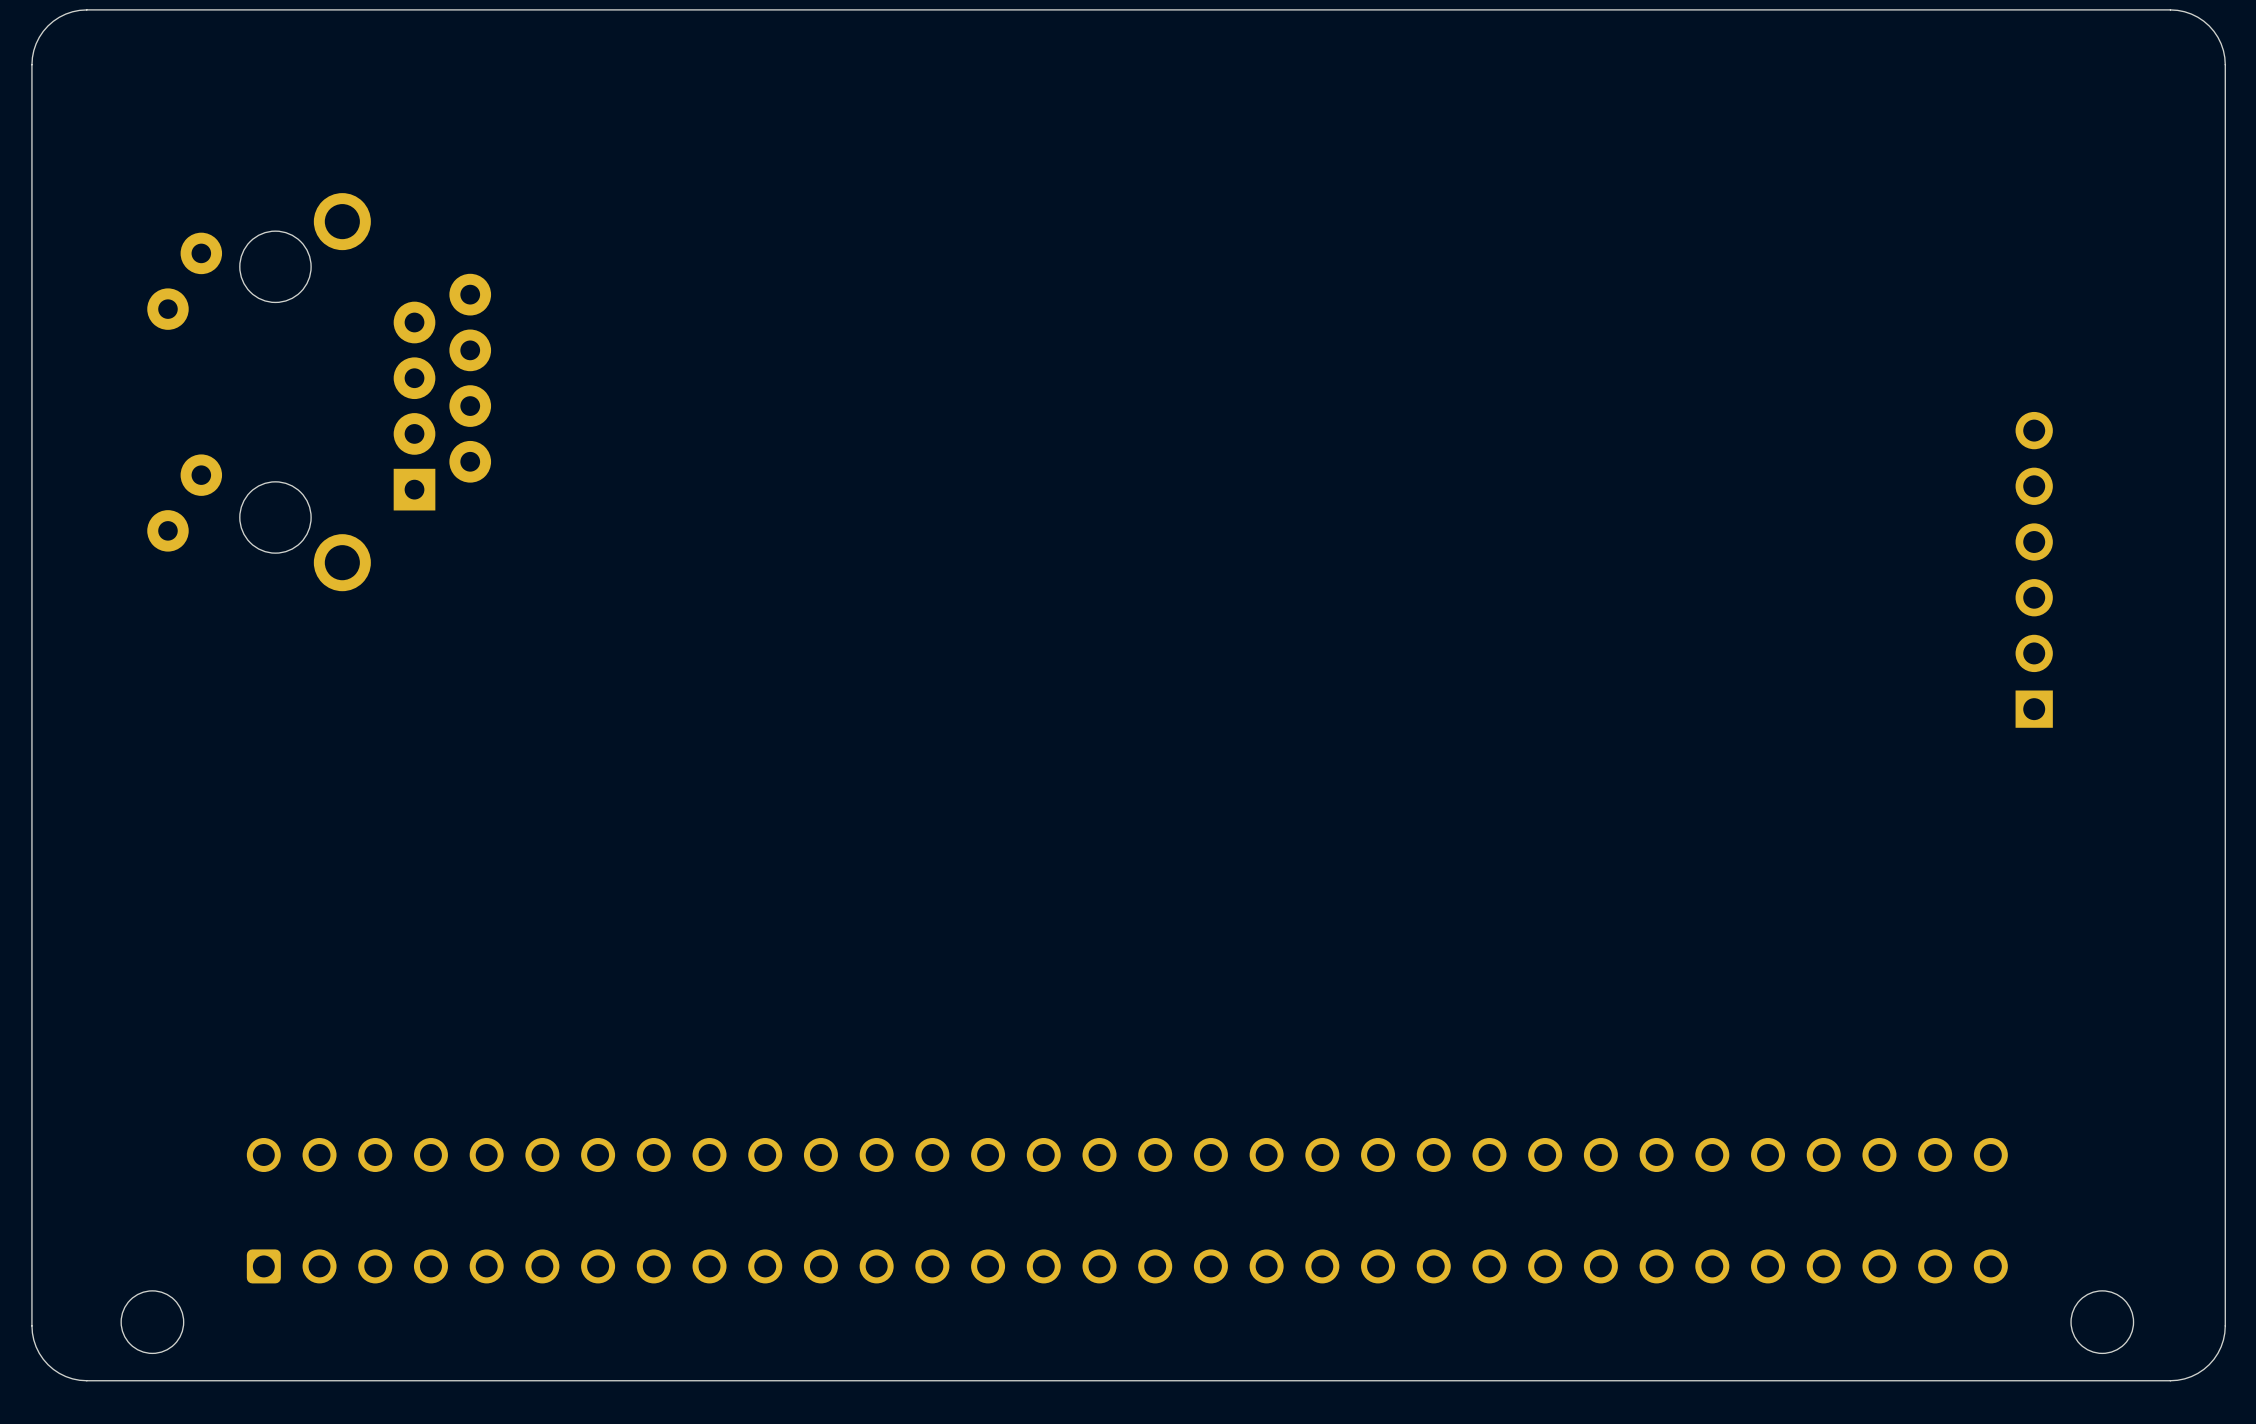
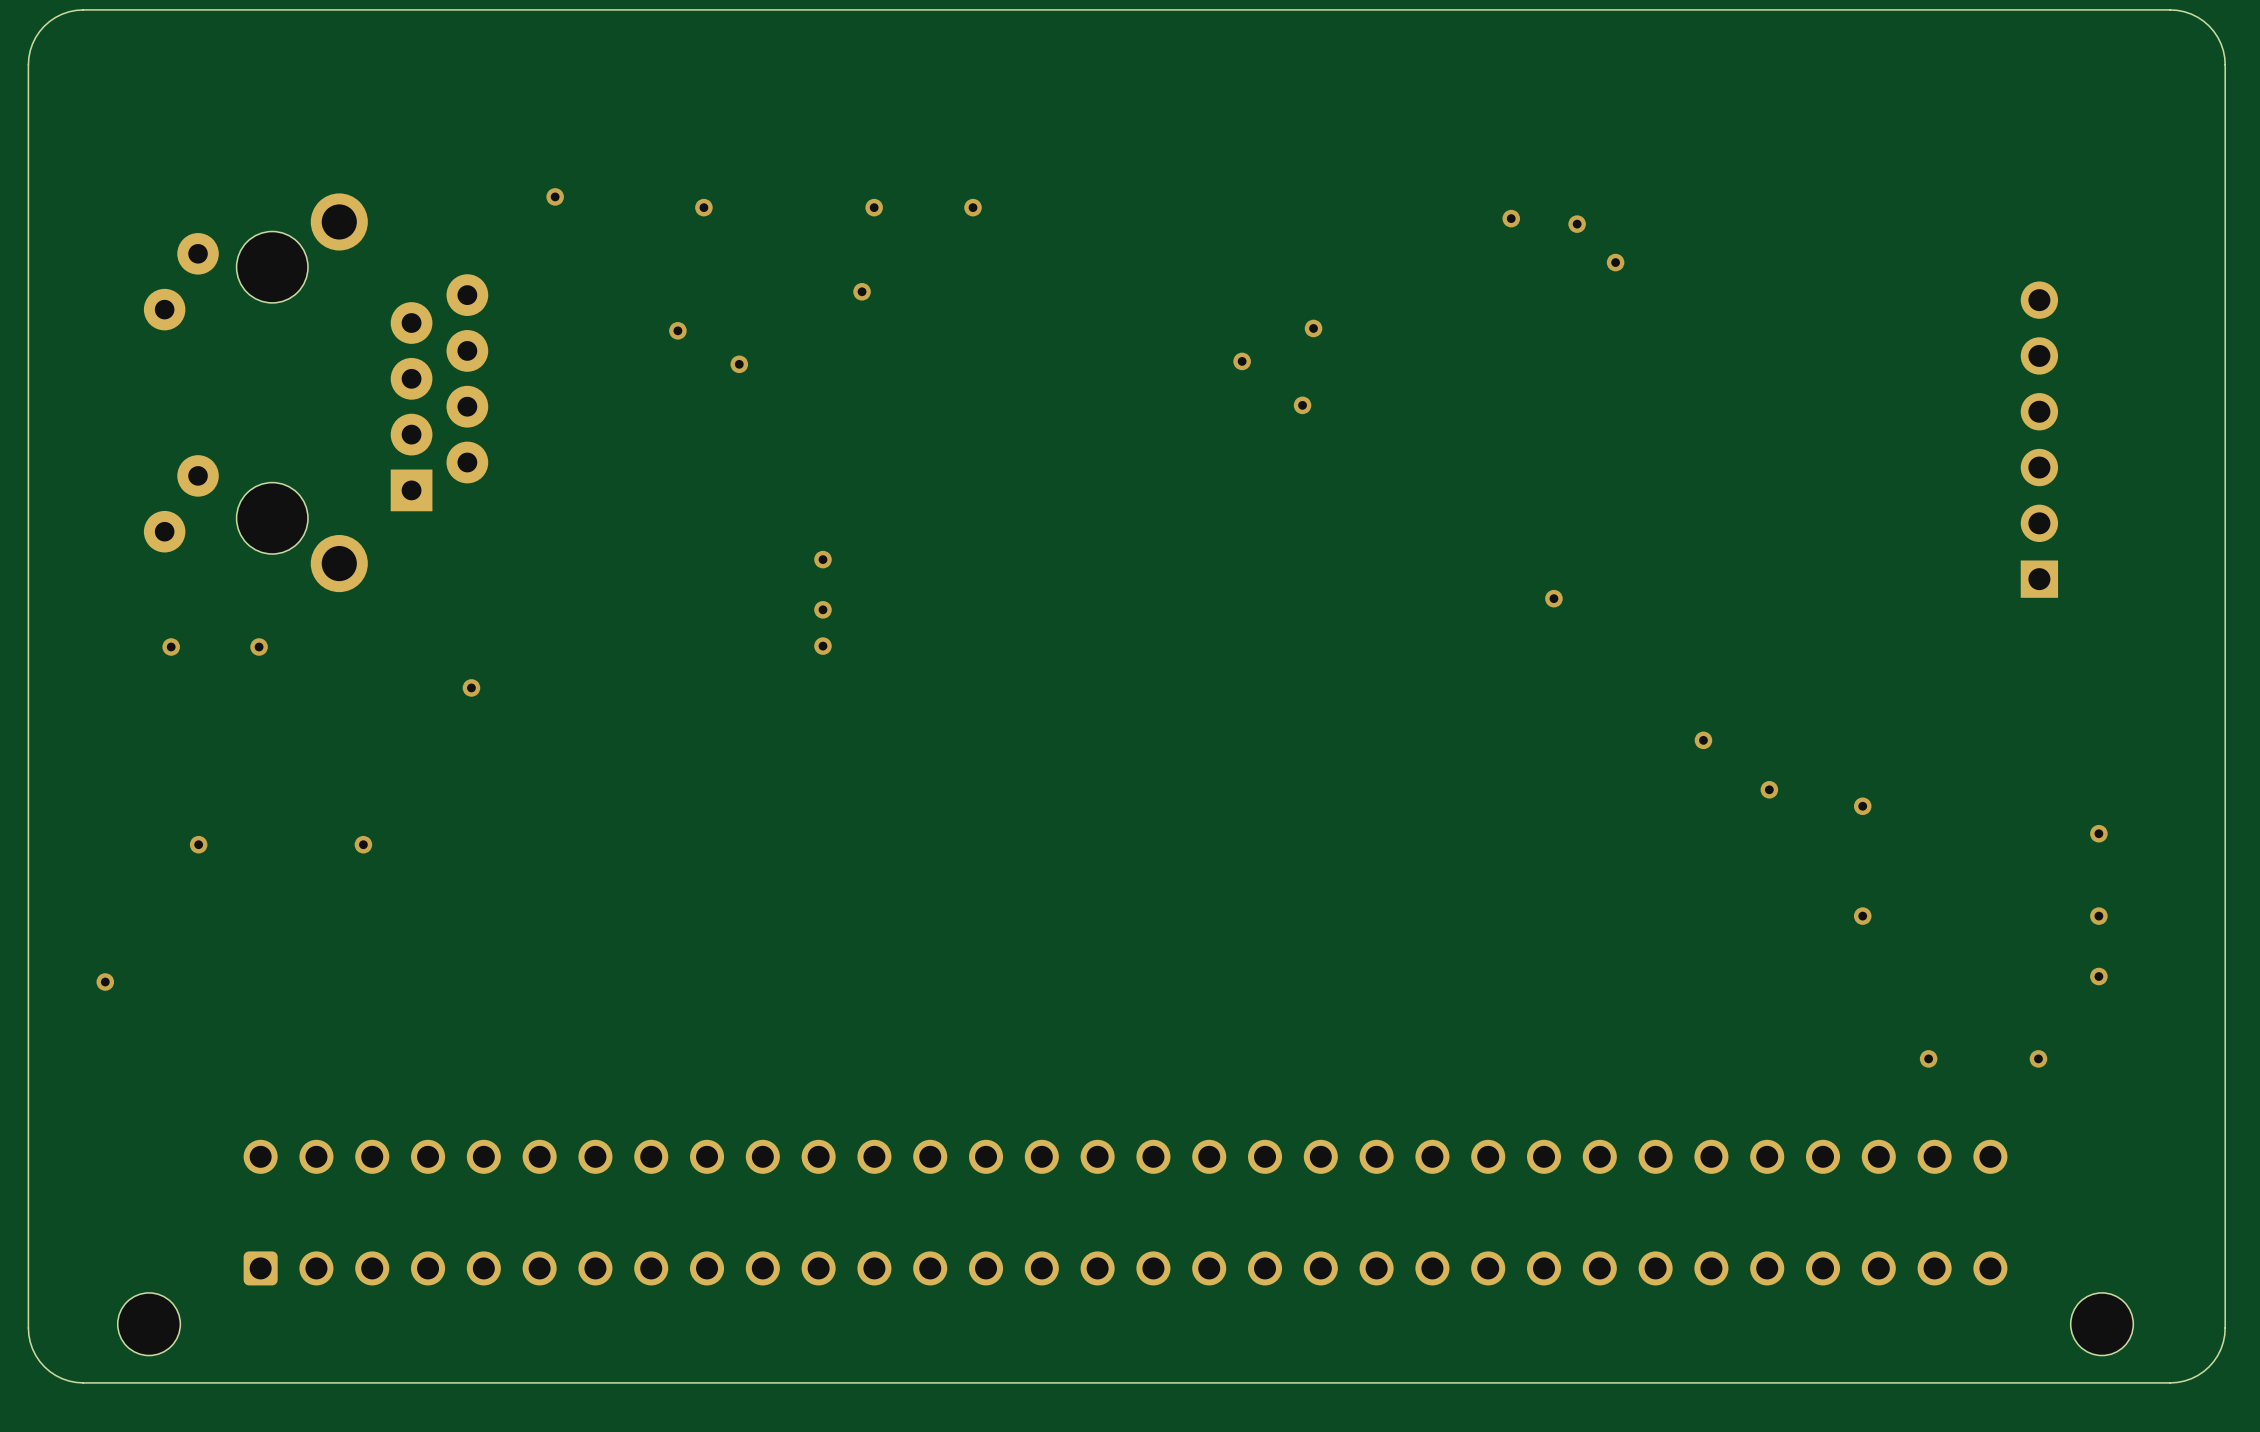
via: none -> (555, 196)
via: none -> (703, 207)
via: none -> (874, 207)
via: none -> (973, 207)
via: none -> (1511, 218)
via: none -> (1577, 224)
via: none -> (1615, 262)
via: none -> (862, 291)
via: none -> (1313, 328)
via: none -> (677, 330)
via: none -> (1242, 361)
via: none -> (739, 364)
via: none -> (1302, 405)
via: none -> (822, 559)
part position: (2034, 569) -> (2039, 439)
via: none -> (1553, 598)
via: none -> (822, 609)
via: none -> (171, 646)
via: none -> (259, 646)
via: none -> (822, 646)
via: none -> (471, 687)
via: none -> (1703, 740)
via: none -> (1769, 789)
via: none -> (1862, 806)
via: none -> (2098, 833)
via: none -> (198, 844)
via: none -> (363, 844)
via: none -> (1862, 916)
via: none -> (2098, 916)
via: none -> (2098, 976)
via: none -> (105, 982)
via: none -> (1928, 1058)
via: none -> (2038, 1058)

